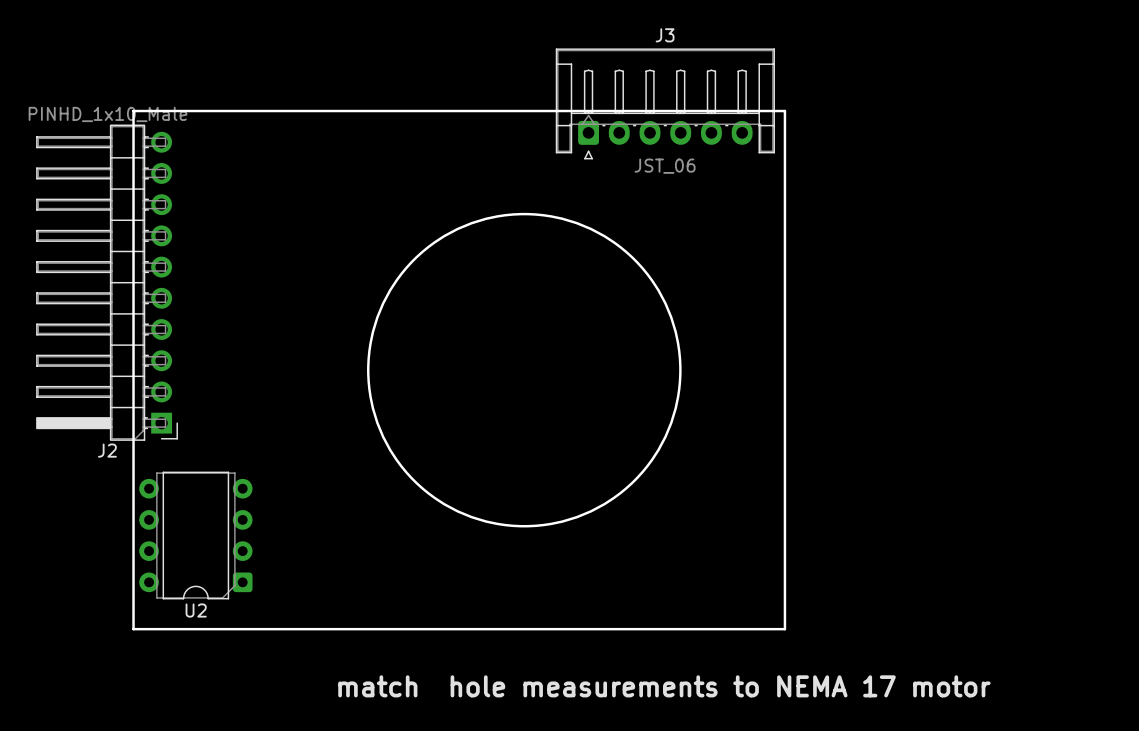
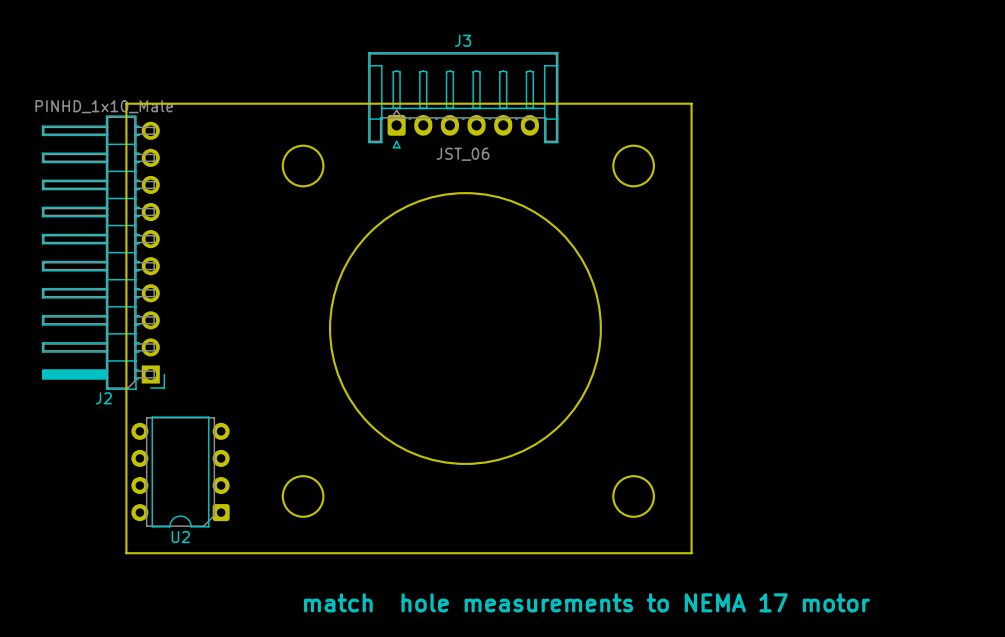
J3 position: (665, 103) -> (463, 100)
round board edge: none -> [281, 144, 325, 188]
round board edge: none -> [612, 144, 655, 188]
round board edge: none -> [281, 475, 325, 518]
round board edge: none -> [612, 475, 655, 518]

